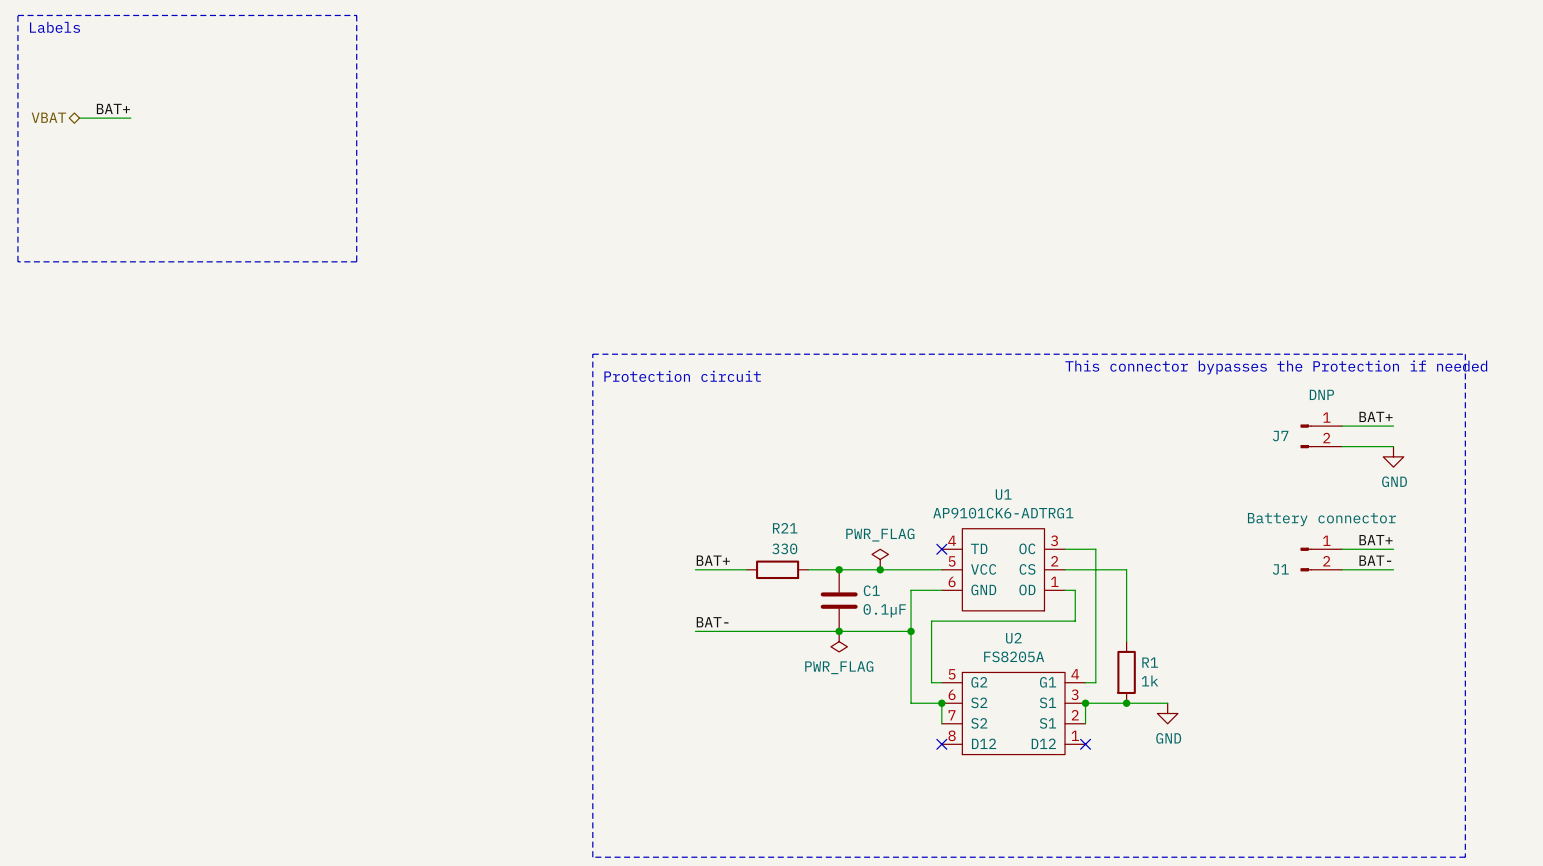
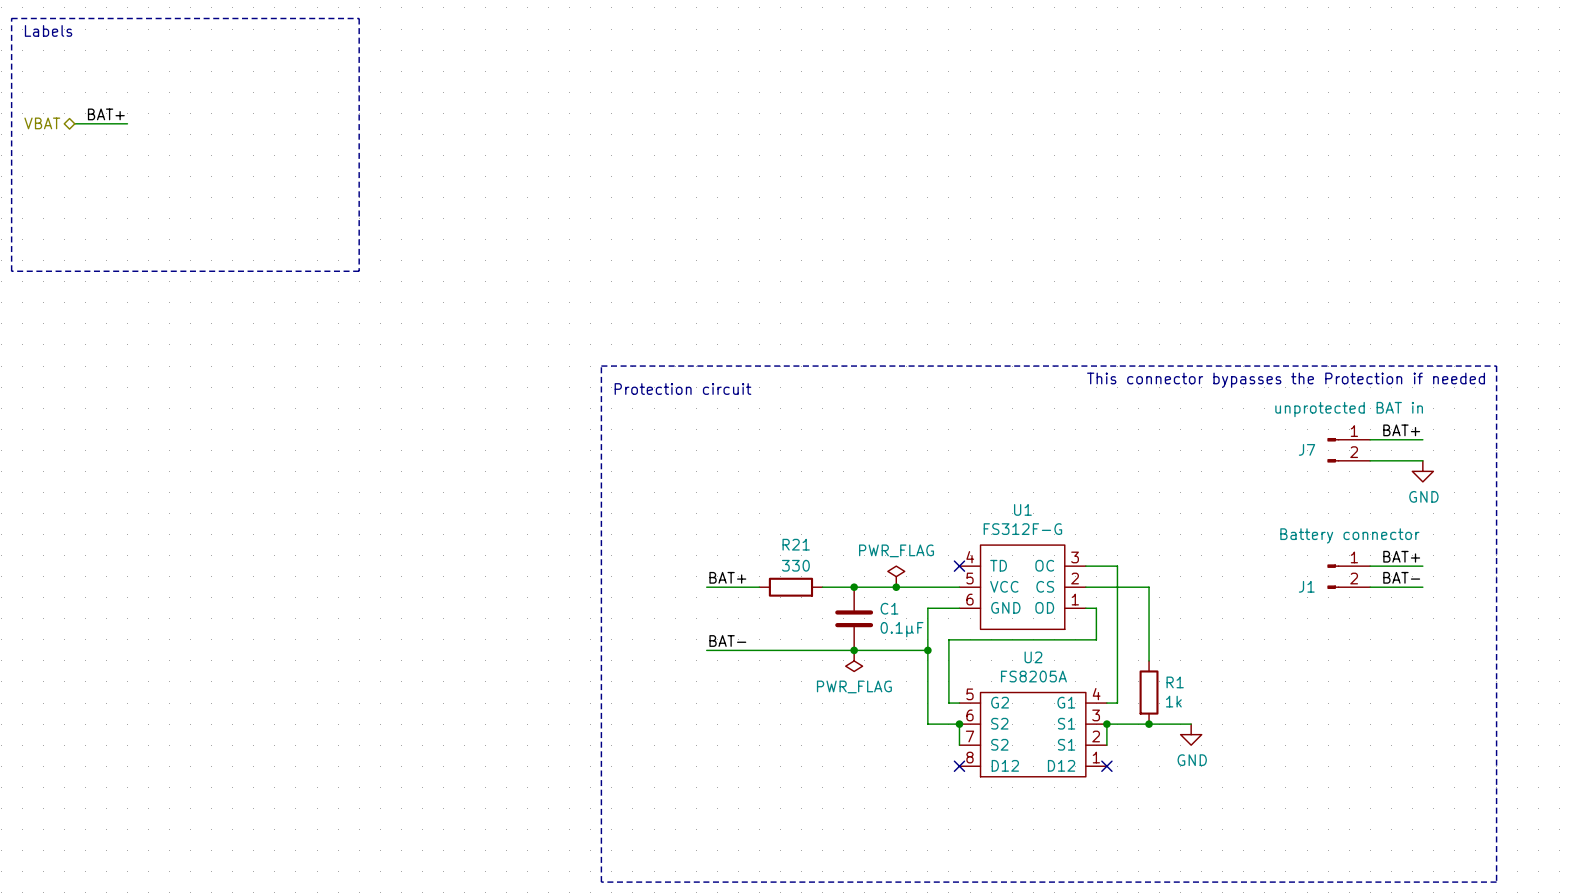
J7 value: DNP (1321, 394) -> unprotected BAT in (1349, 409)
U1 value: AP9101CK6-ADTRG1 (1003, 513) -> FS312F-G (1022, 529)

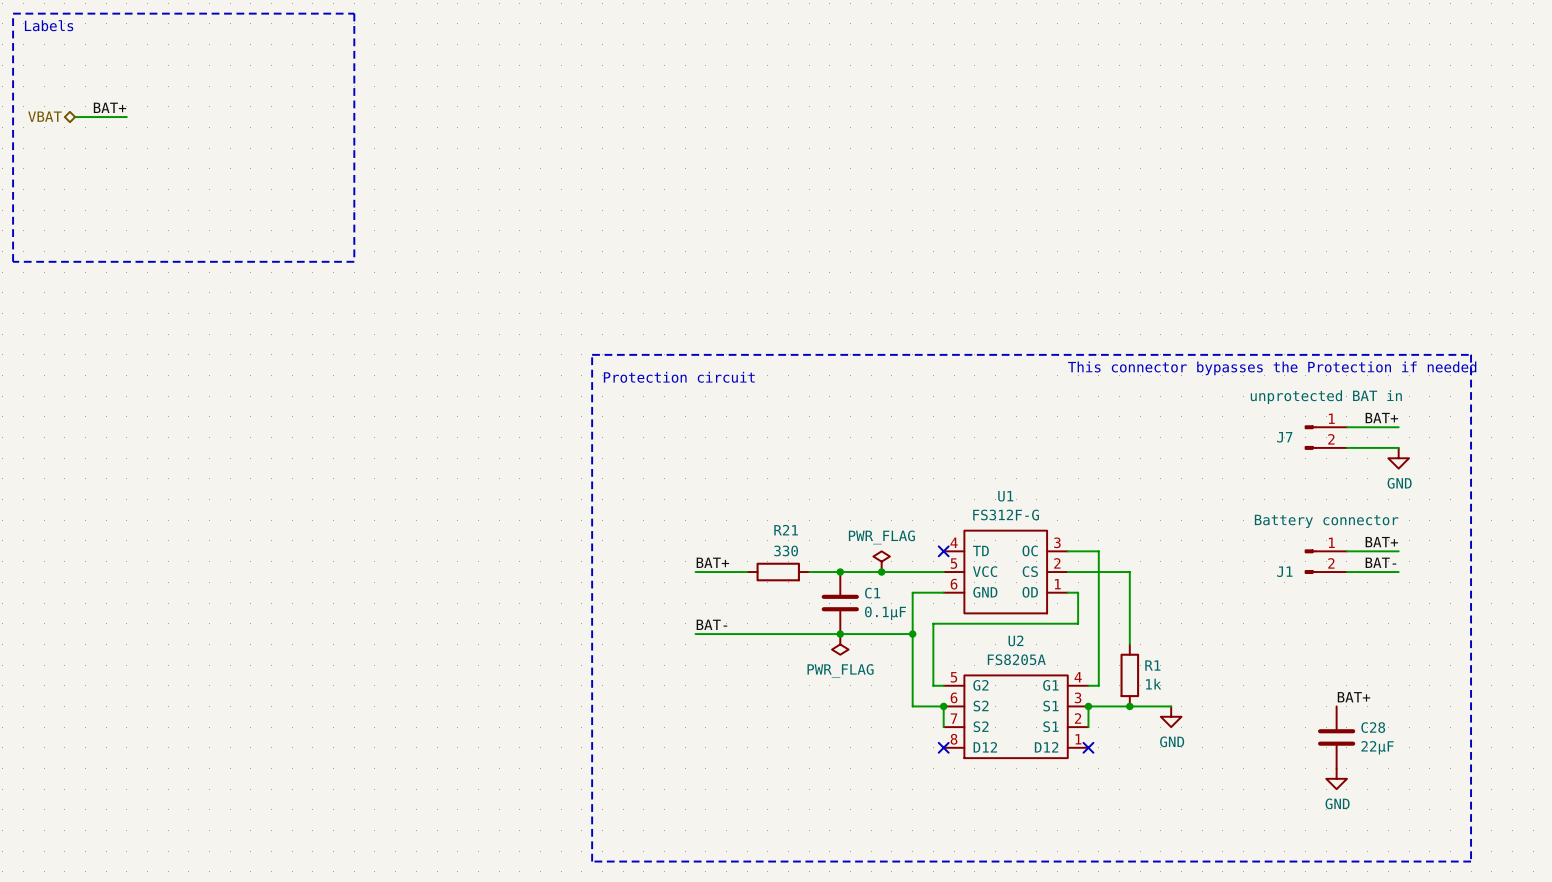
label: none -> BAT+ (1353, 697)
C28: none -> 22µF (1336, 737)
power symbol: none -> GND (1336, 778)

